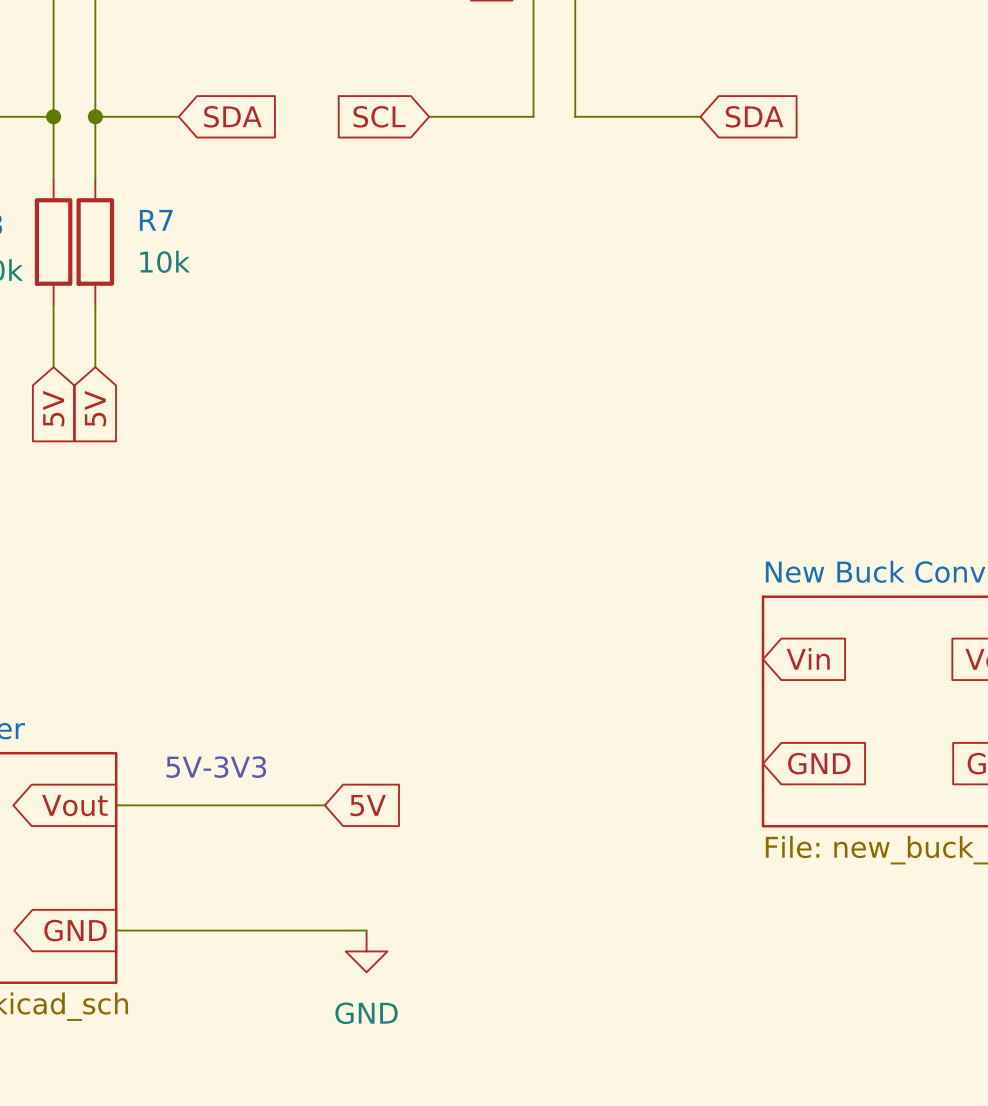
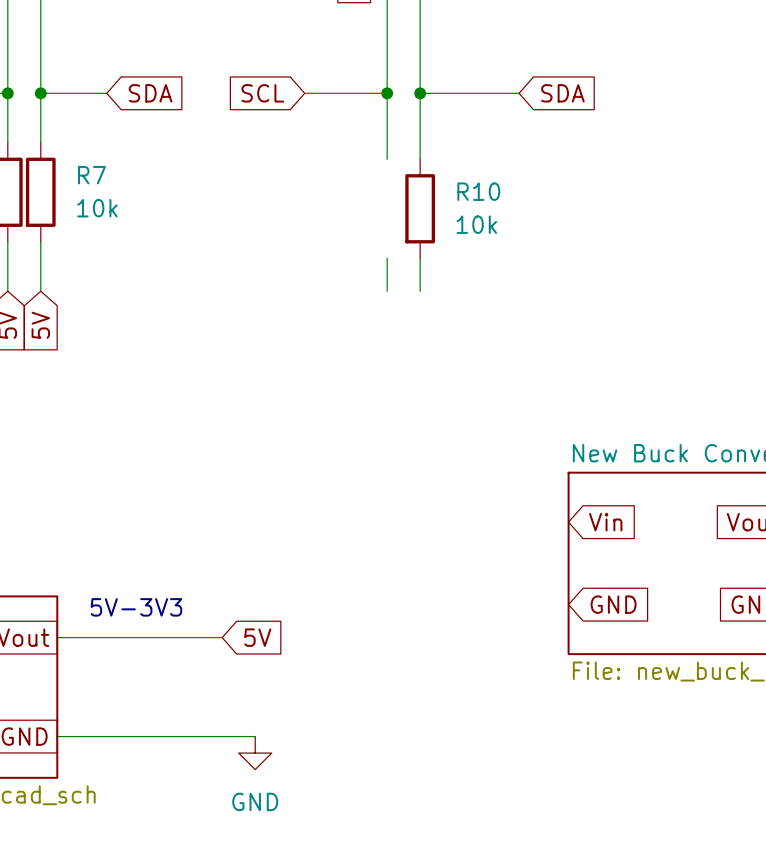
wire: none -> (387, 93) (387, 159)
junction: none -> (387, 93)
wire: none -> (420, 93) (420, 159)
junction: none -> (420, 93)
R10: none -> 10k (420, 208)
wire: none -> (387, 258) (387, 291)
wire: none -> (420, 258) (420, 291)

